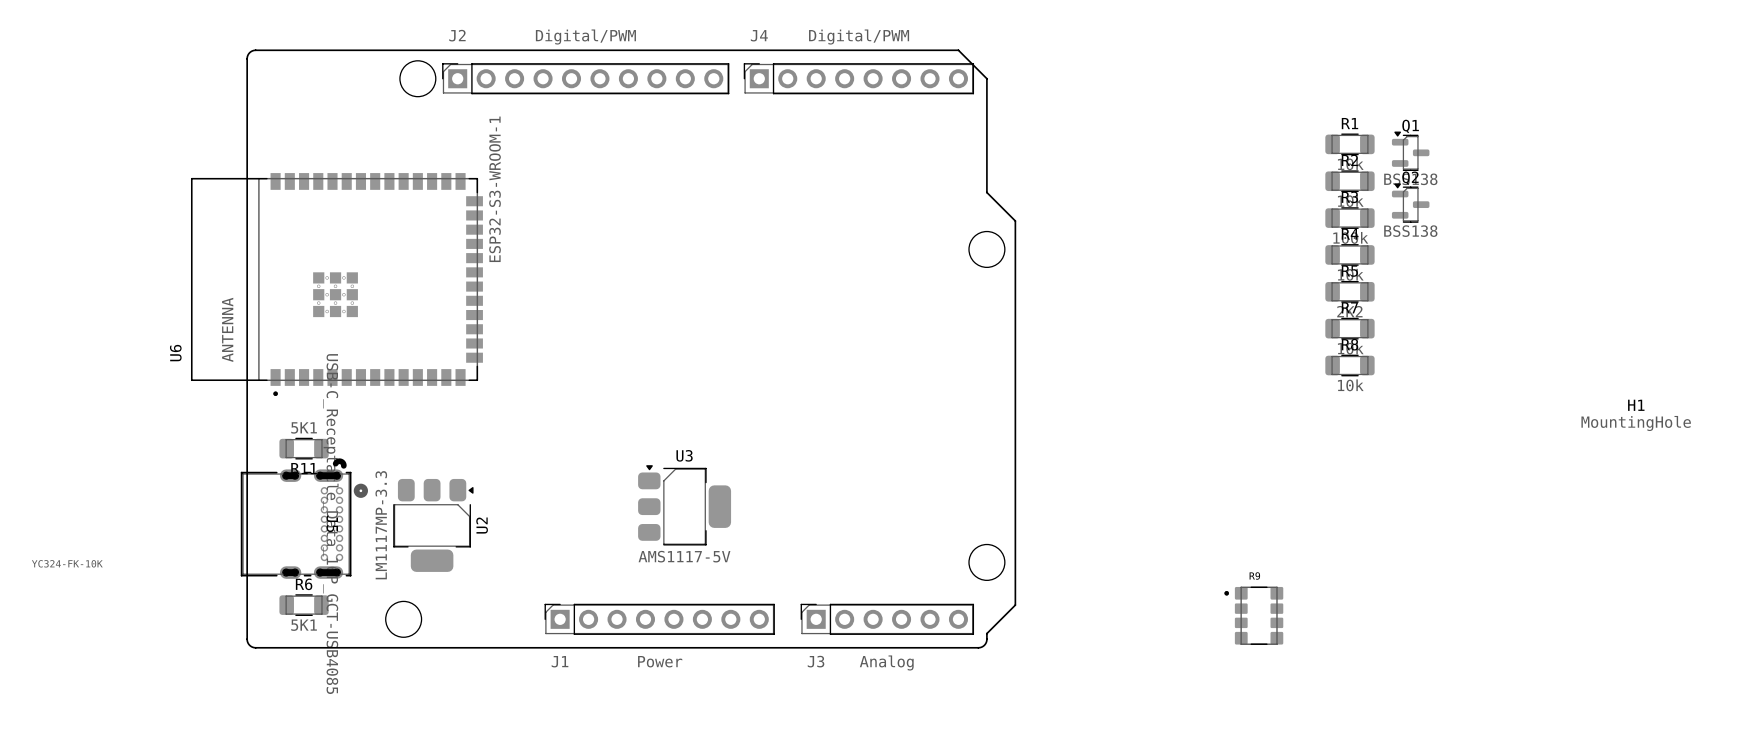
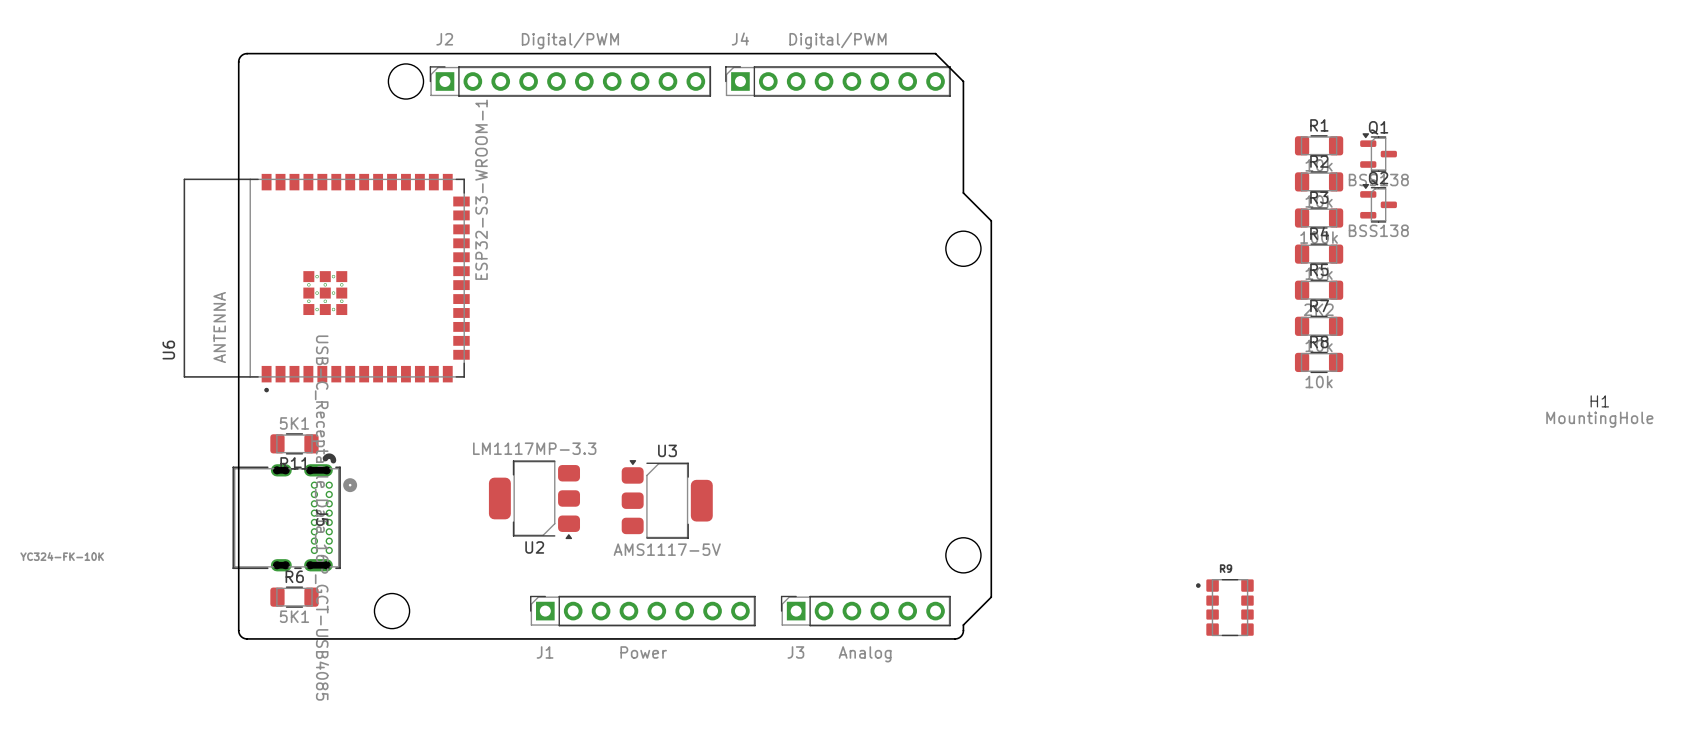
U2 rotation: 0° (433, 525) -> 90° clockwise (534, 499)
U2 position: (433, 525) -> (534, 499)

